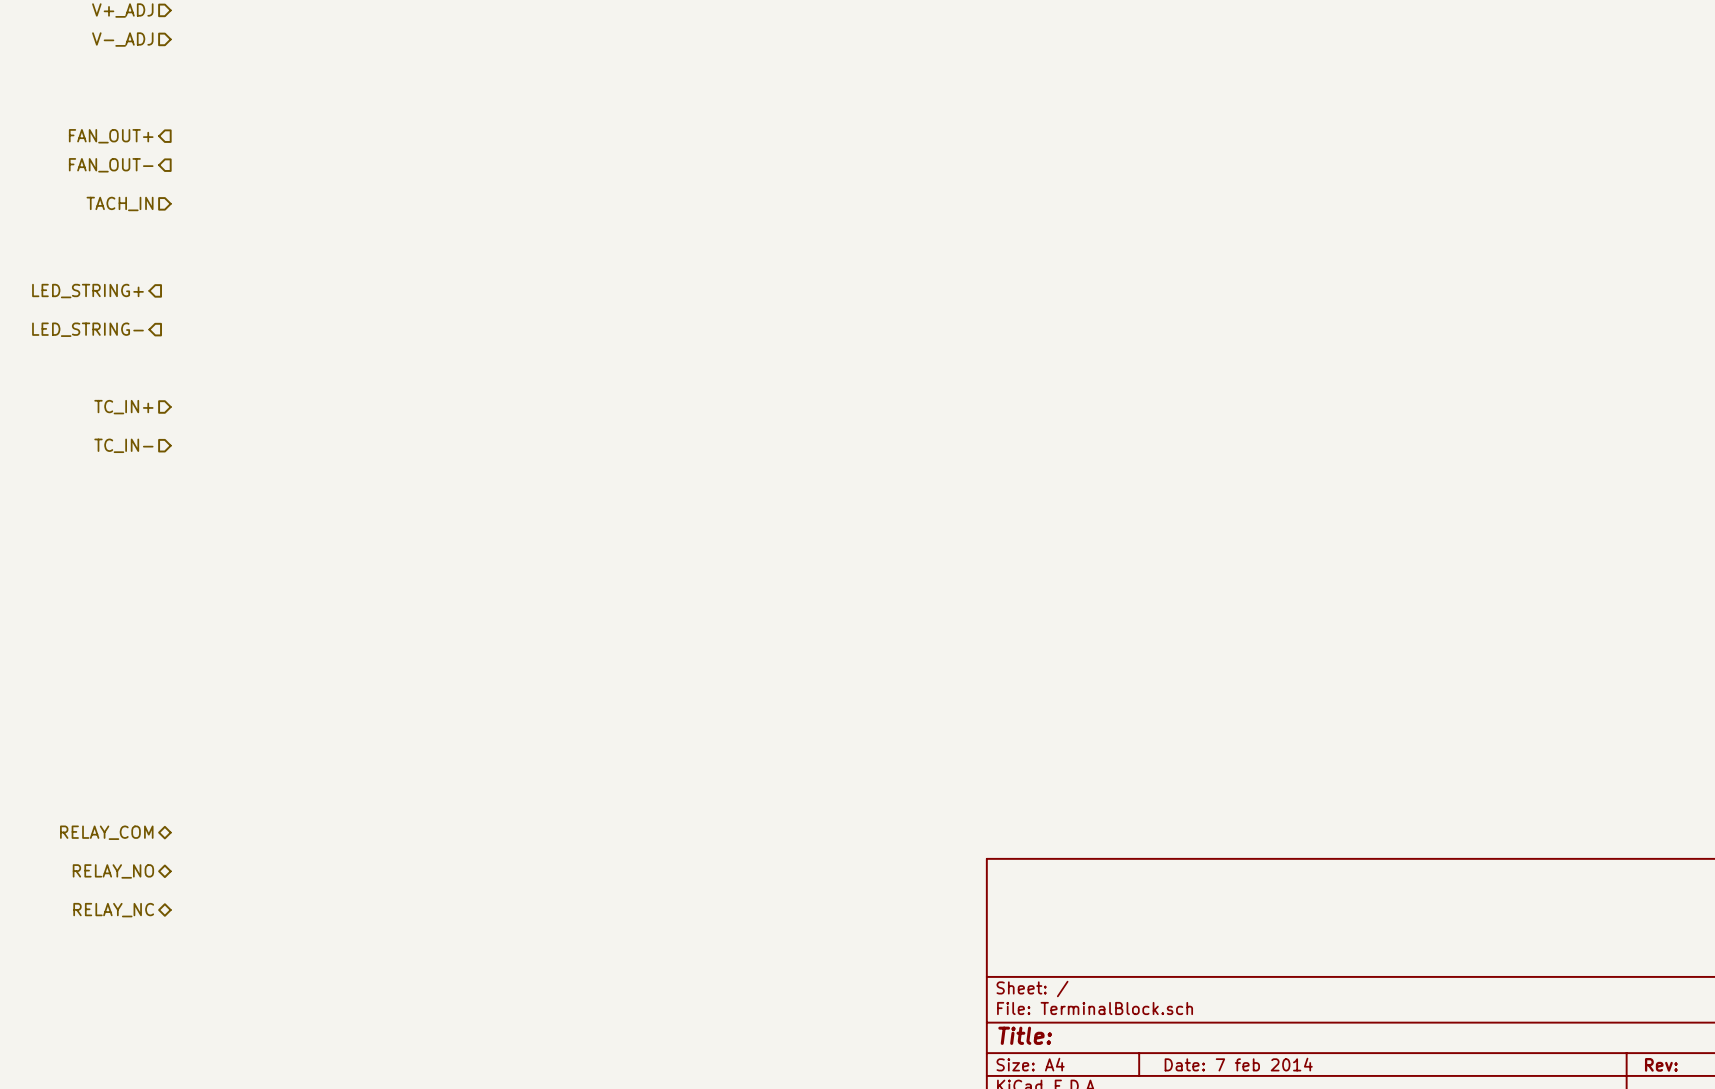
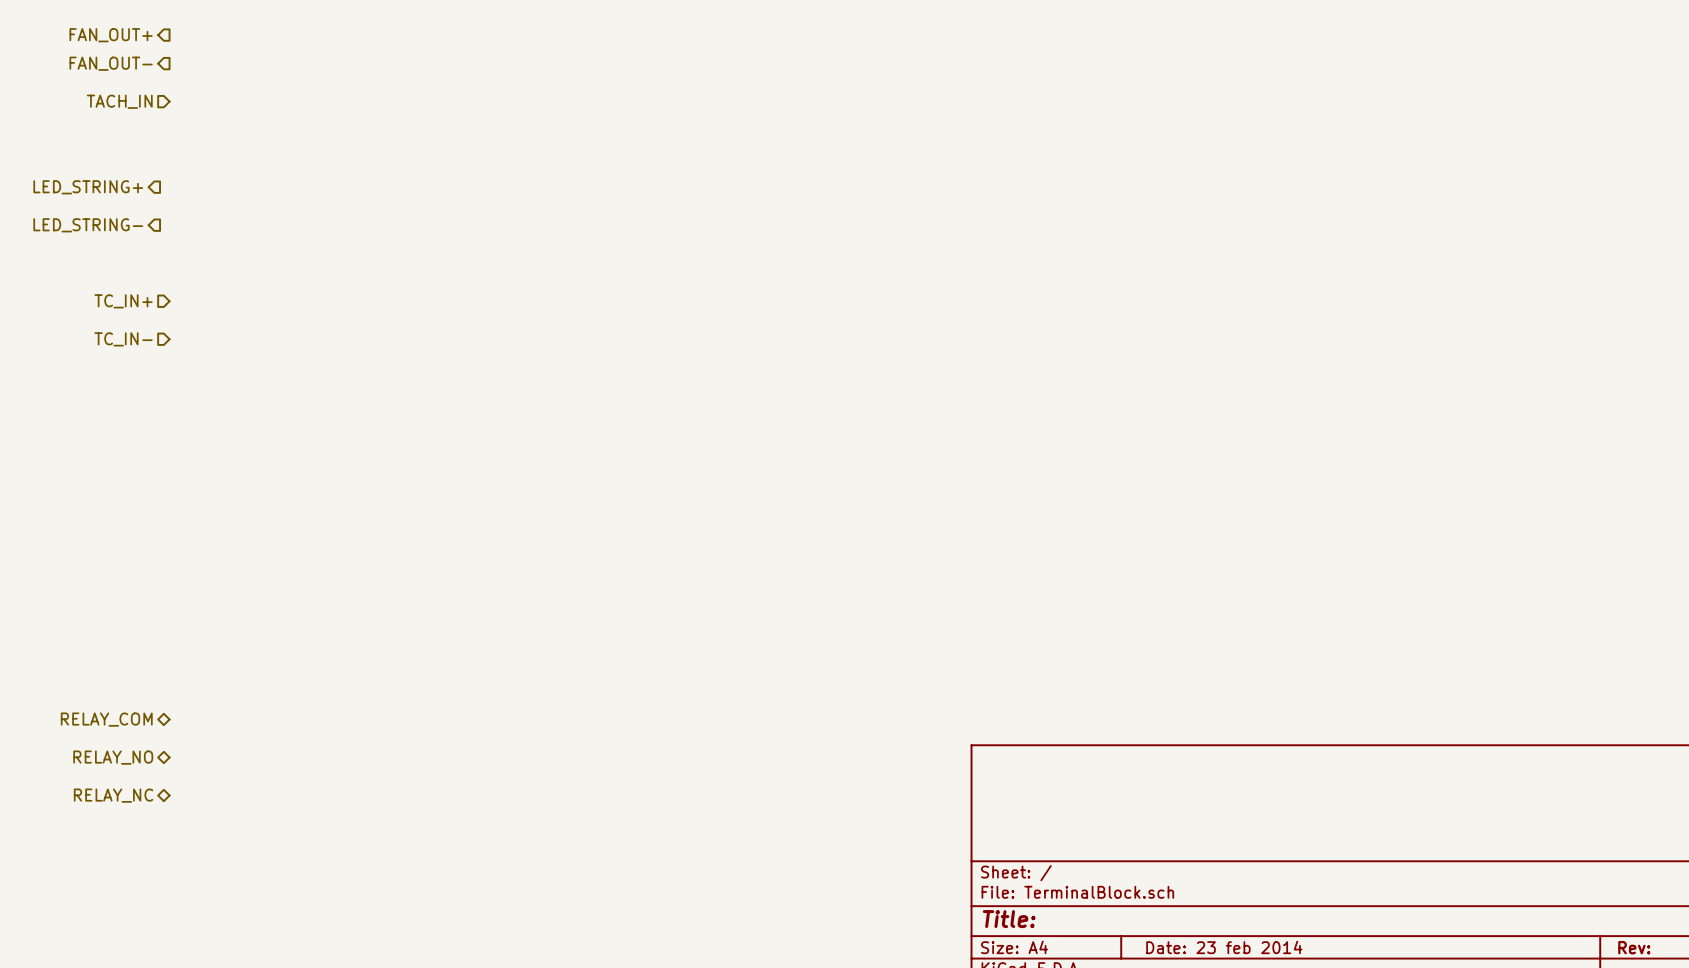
title block: Date: 7 feb 2014 (1238, 1064) -> Date: 23 feb 2014 (1224, 947)

